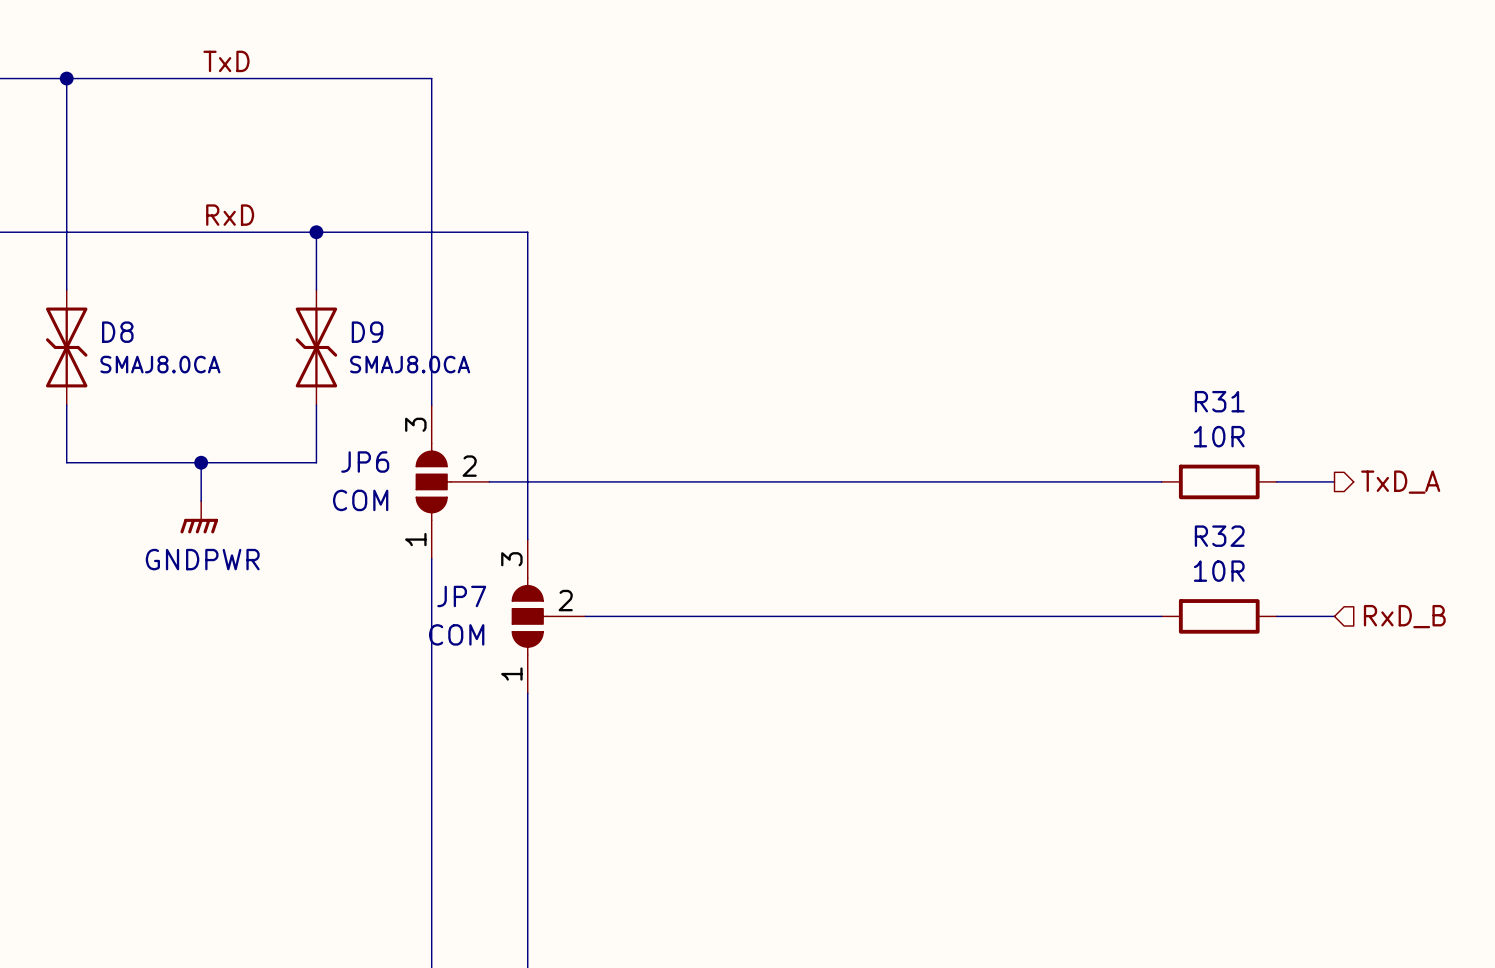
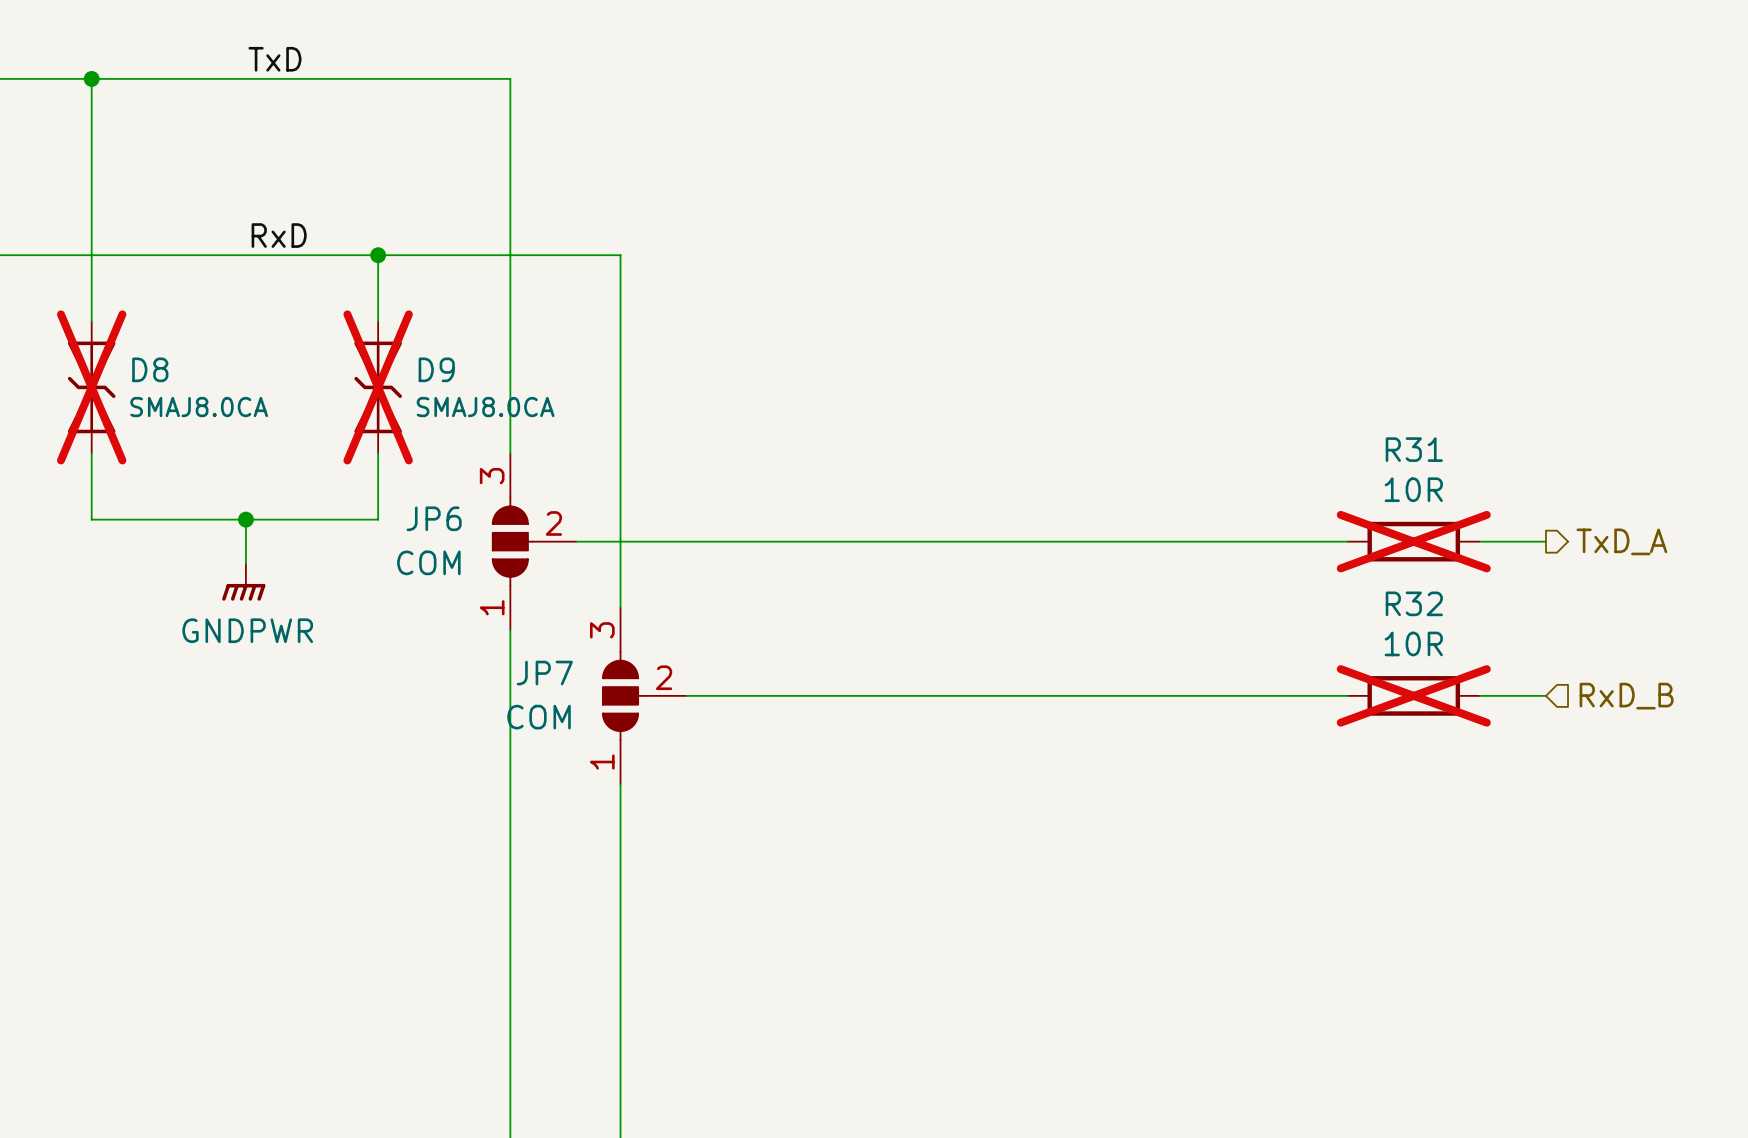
D8 do-not-place cross: none -> (91, 387)
D9 do-not-place cross: none -> (378, 387)
R31 do-not-place cross: none -> (1413, 541)
R32 do-not-place cross: none -> (1413, 695)

